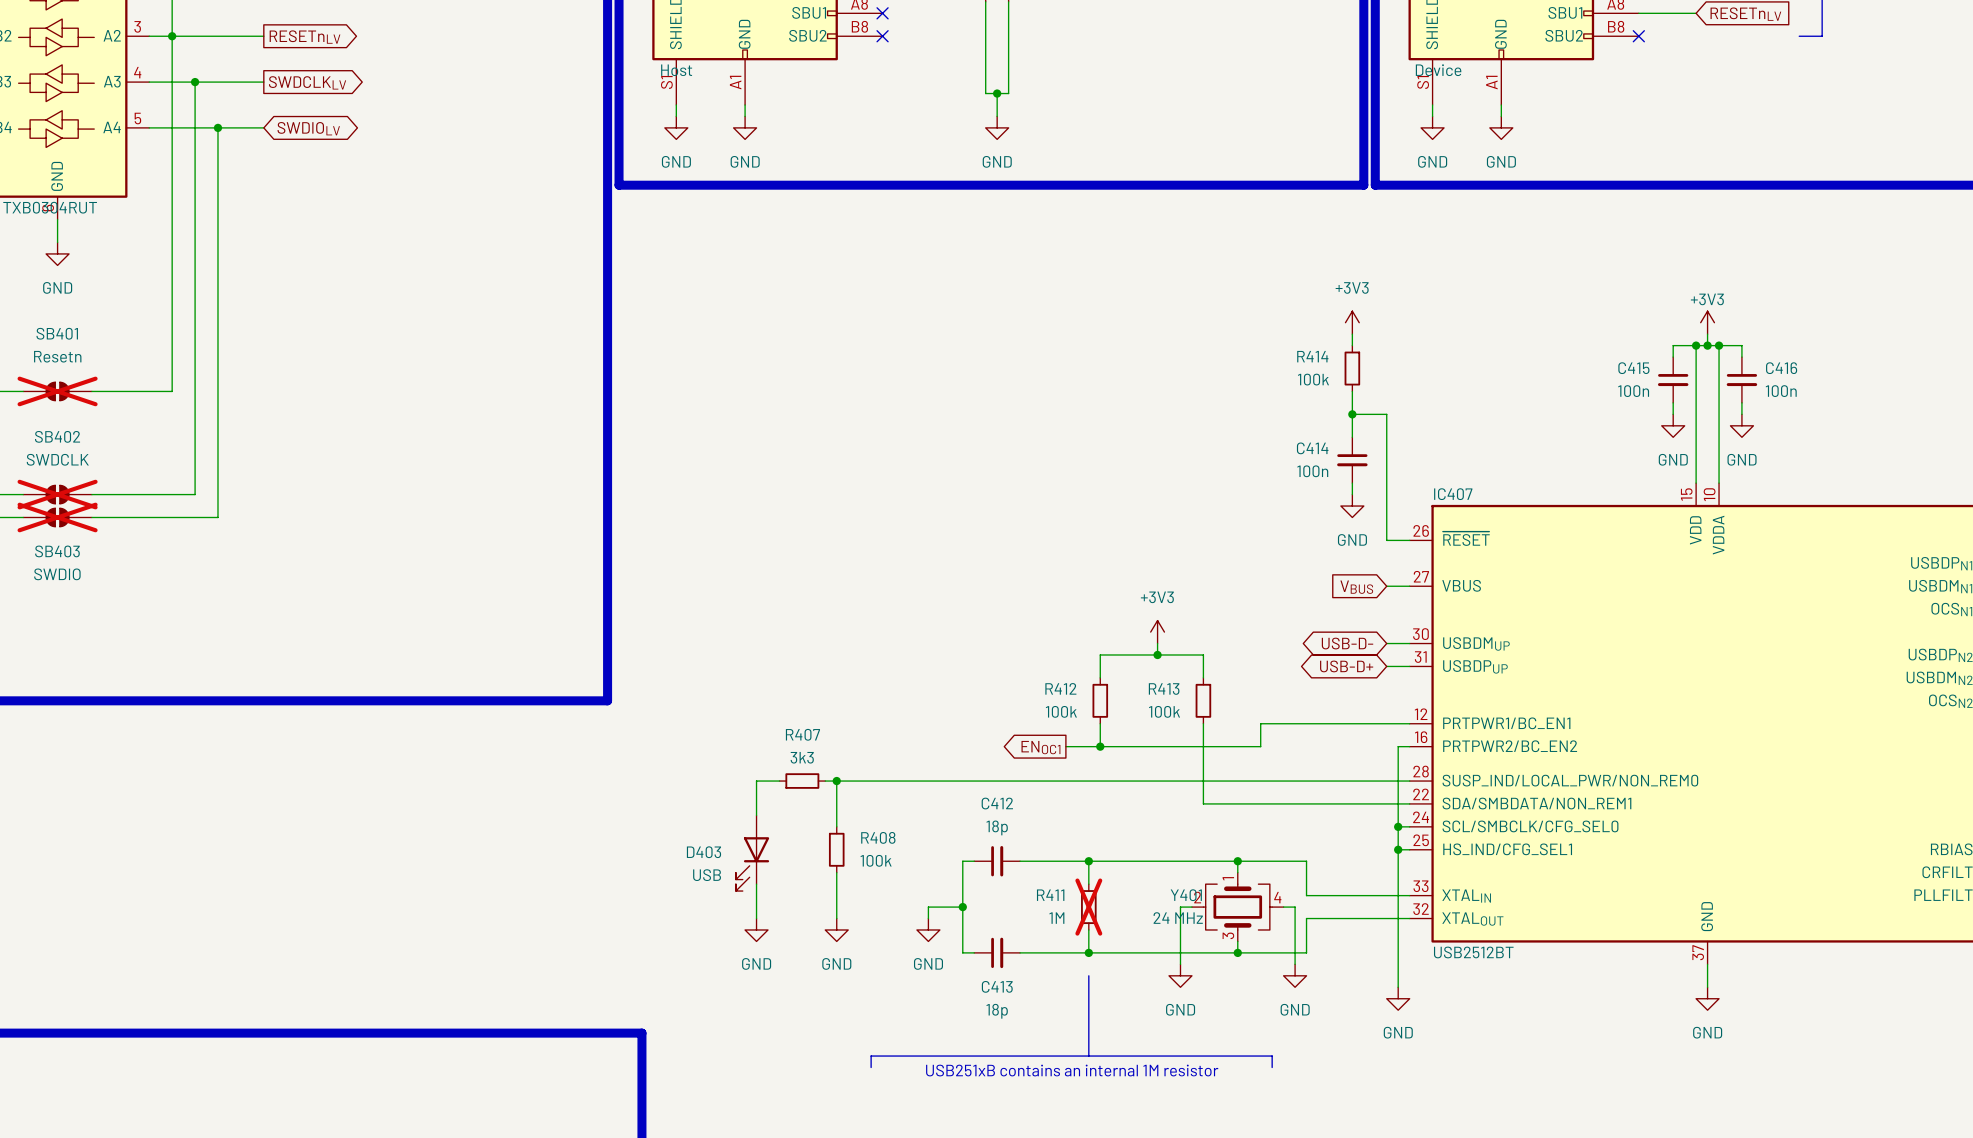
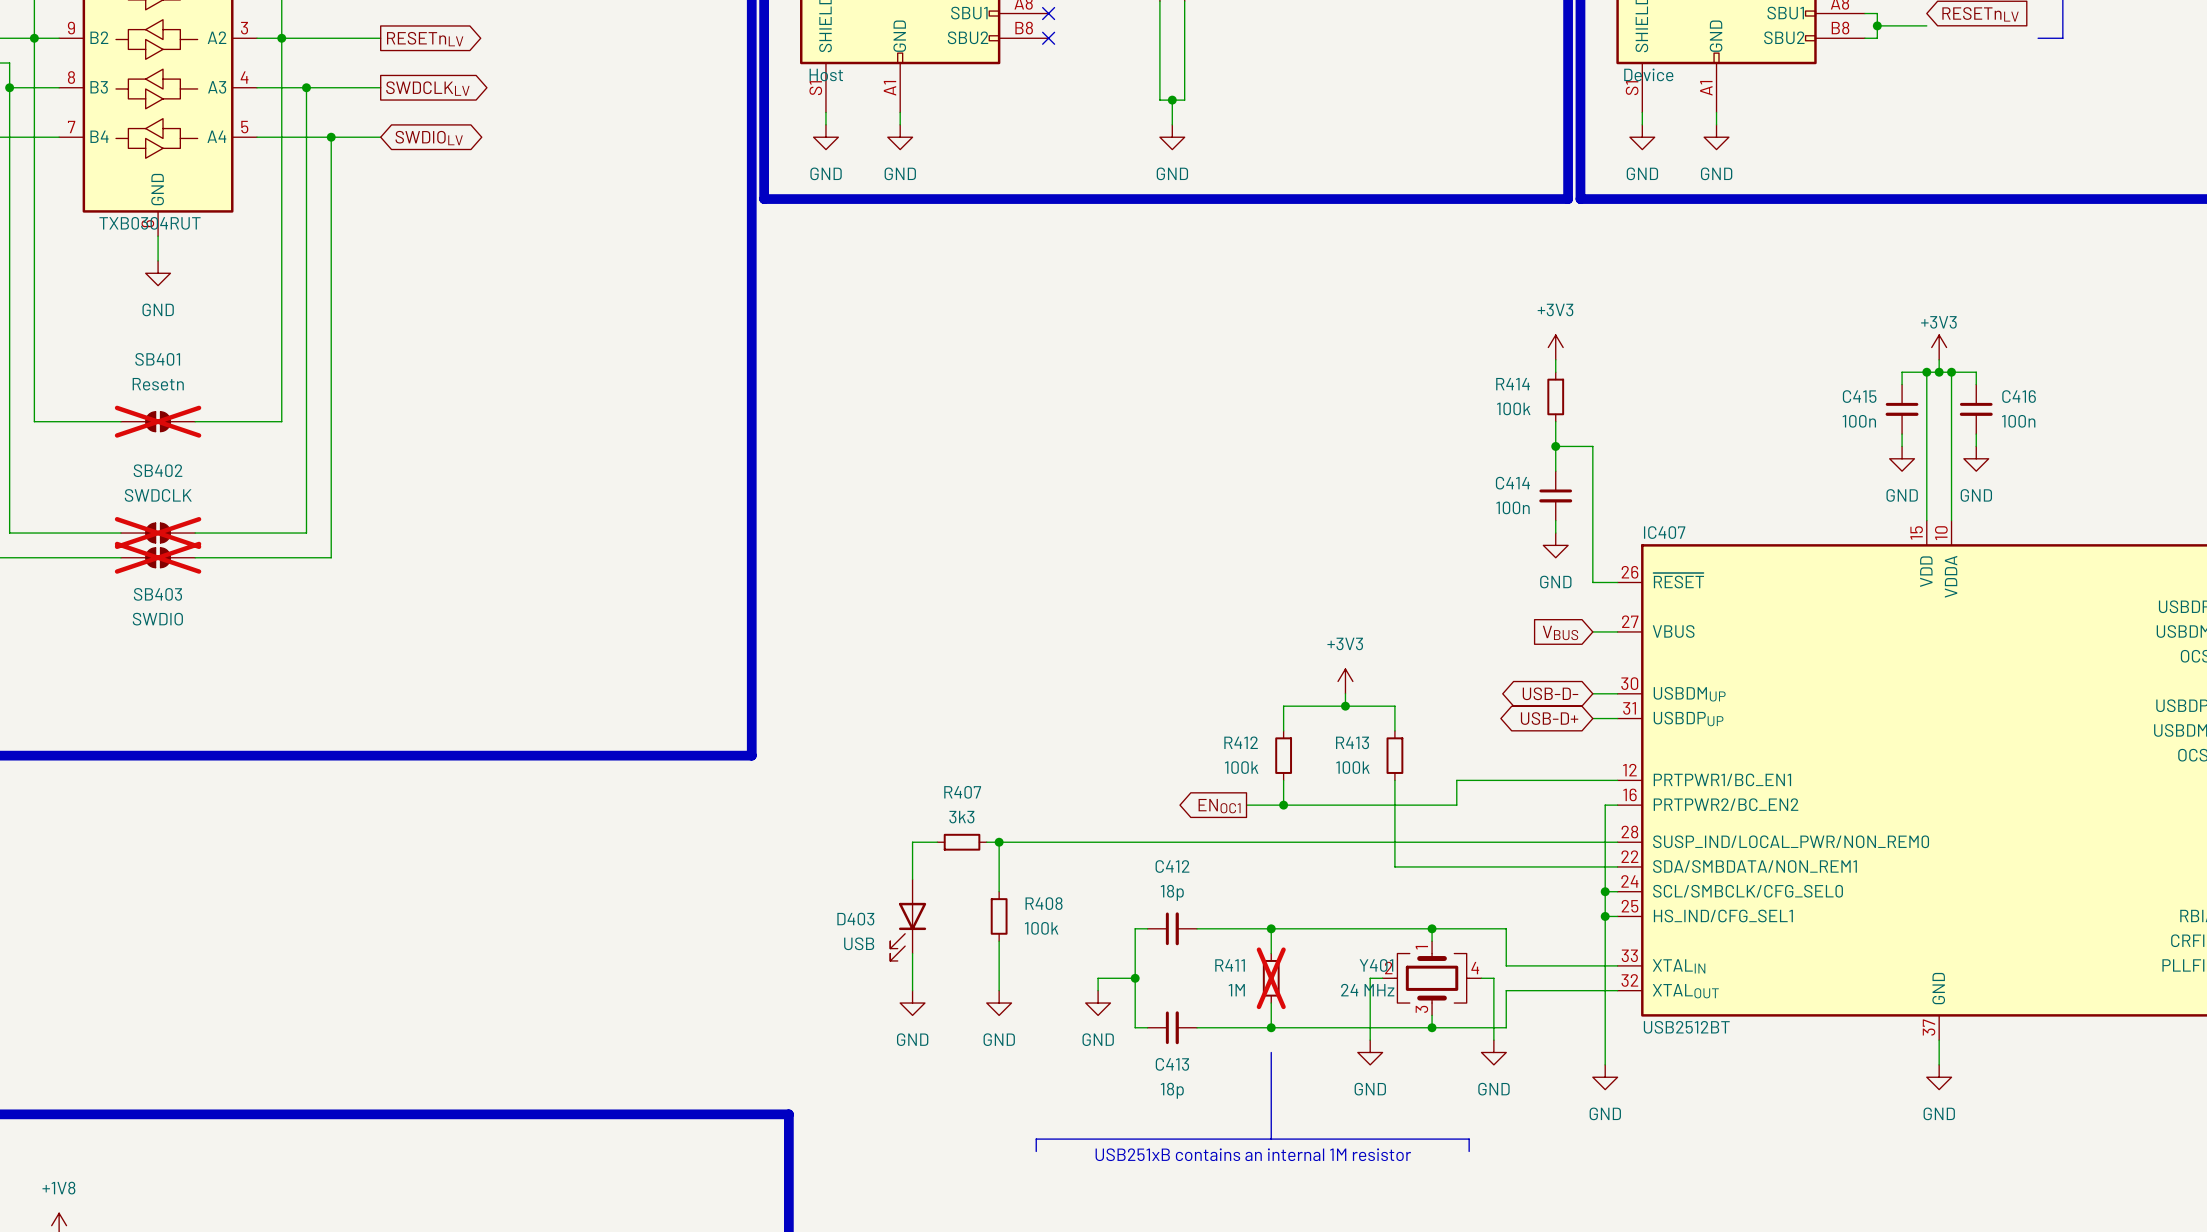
wire: (1650, 13) (1696, 13) -> (1877, 13) (1877, 38) (1864, 38)
wire: none -> (1877, 25) (1926, 25)
junction: none -> (1877, 25)
no-connect mark: (1638, 36) -> none

